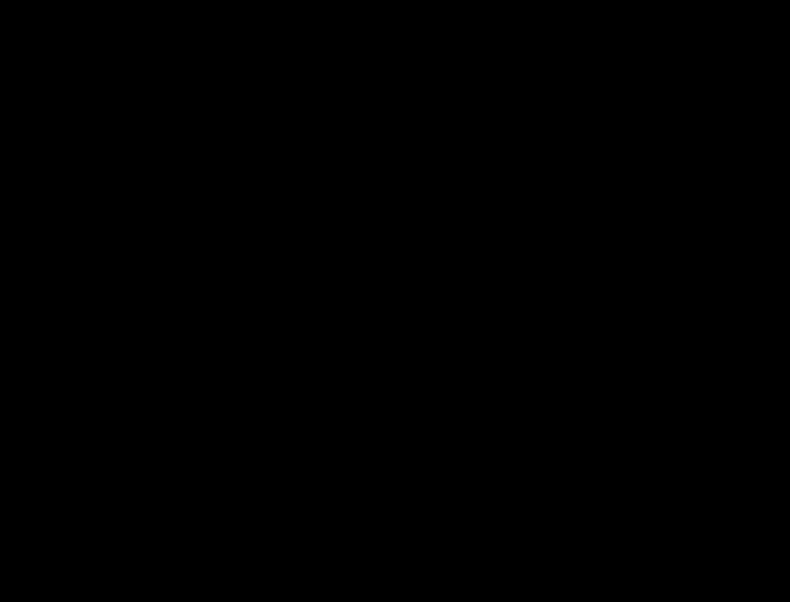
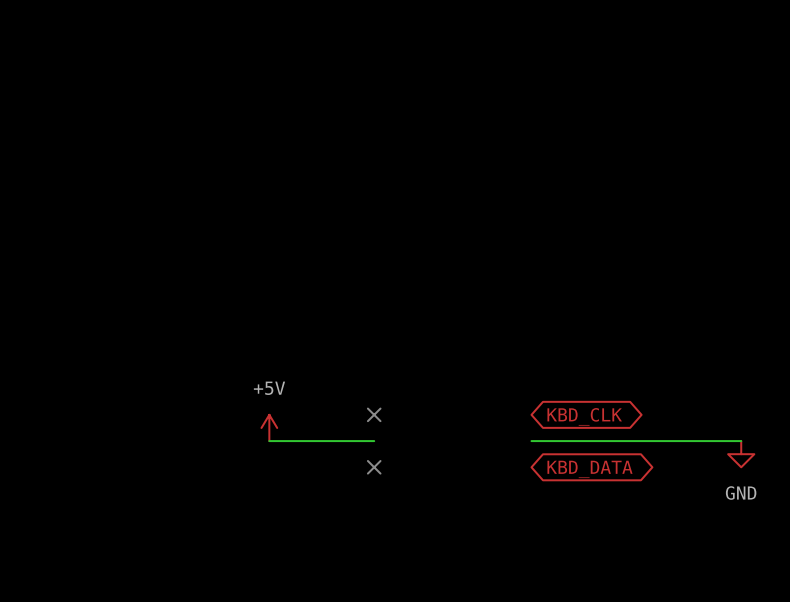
no-connect mark: none -> (374, 414)
global label: none -> KBD_CLK (584, 416)
power symbol: none -> +5V (269, 427)
wire: none -> (269, 441) (374, 441)
wire: none -> (531, 441) (741, 441)
power symbol: none -> GND (741, 454)
no-connect mark: none -> (374, 467)
global label: none -> KBD_DATA (589, 469)

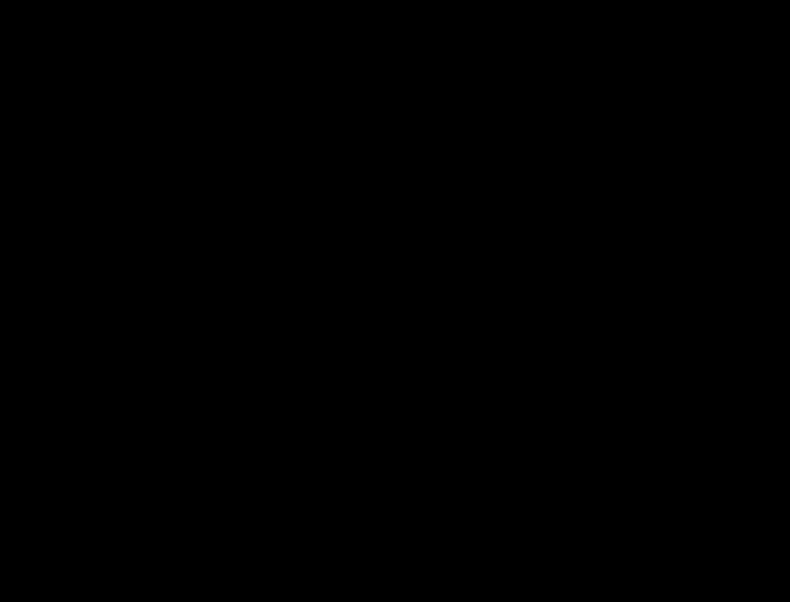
no-connect mark: (374, 414) -> none
global label: KBD_CLK (584, 416) -> none
power symbol: +5V (269, 427) -> none
wire: (269, 441) (374, 441) -> none
wire: (531, 441) (741, 441) -> none
power symbol: GND (741, 454) -> none
no-connect mark: (374, 467) -> none
global label: KBD_DATA (589, 469) -> none

